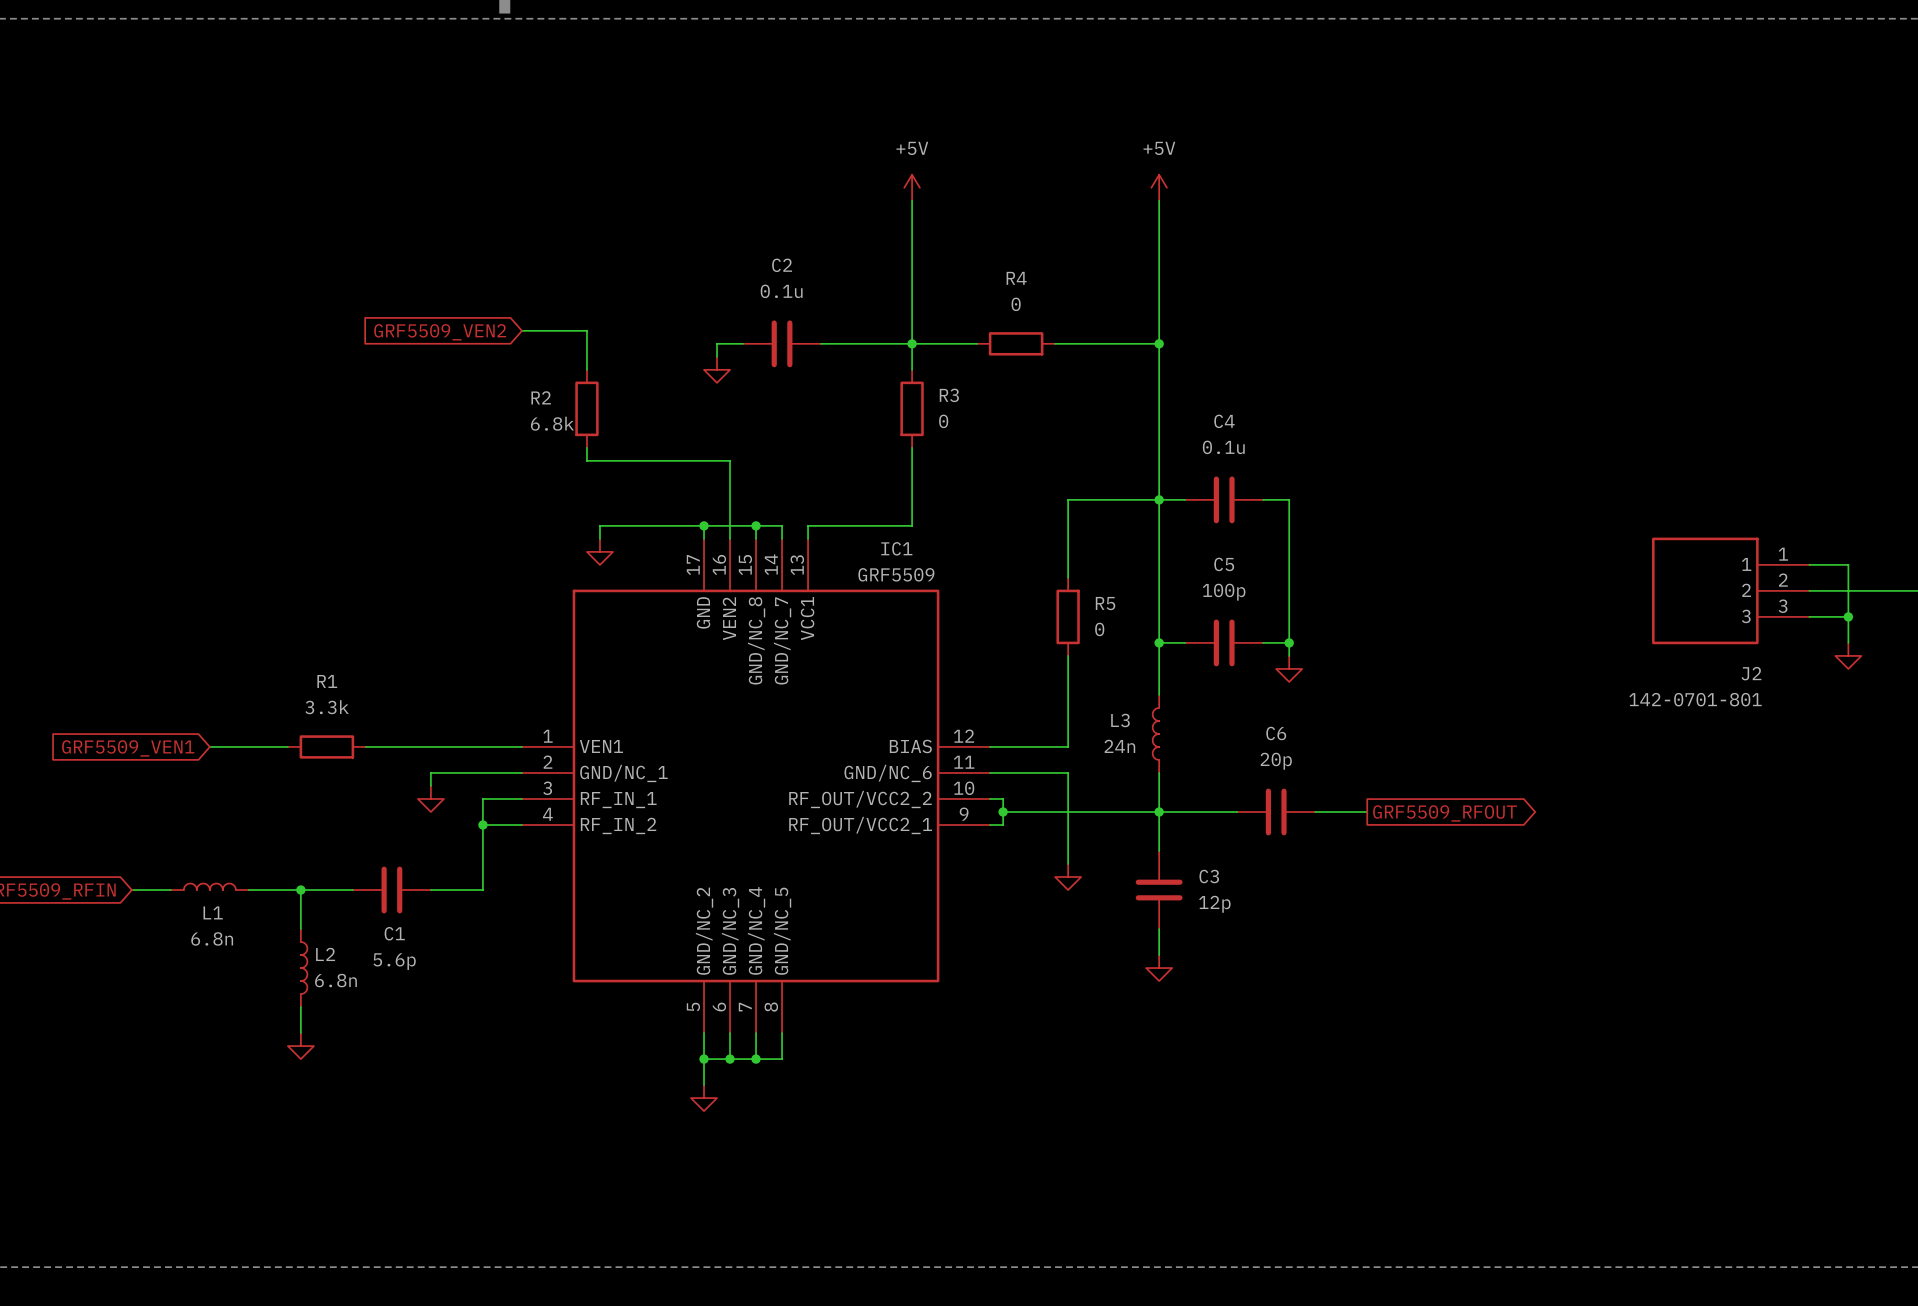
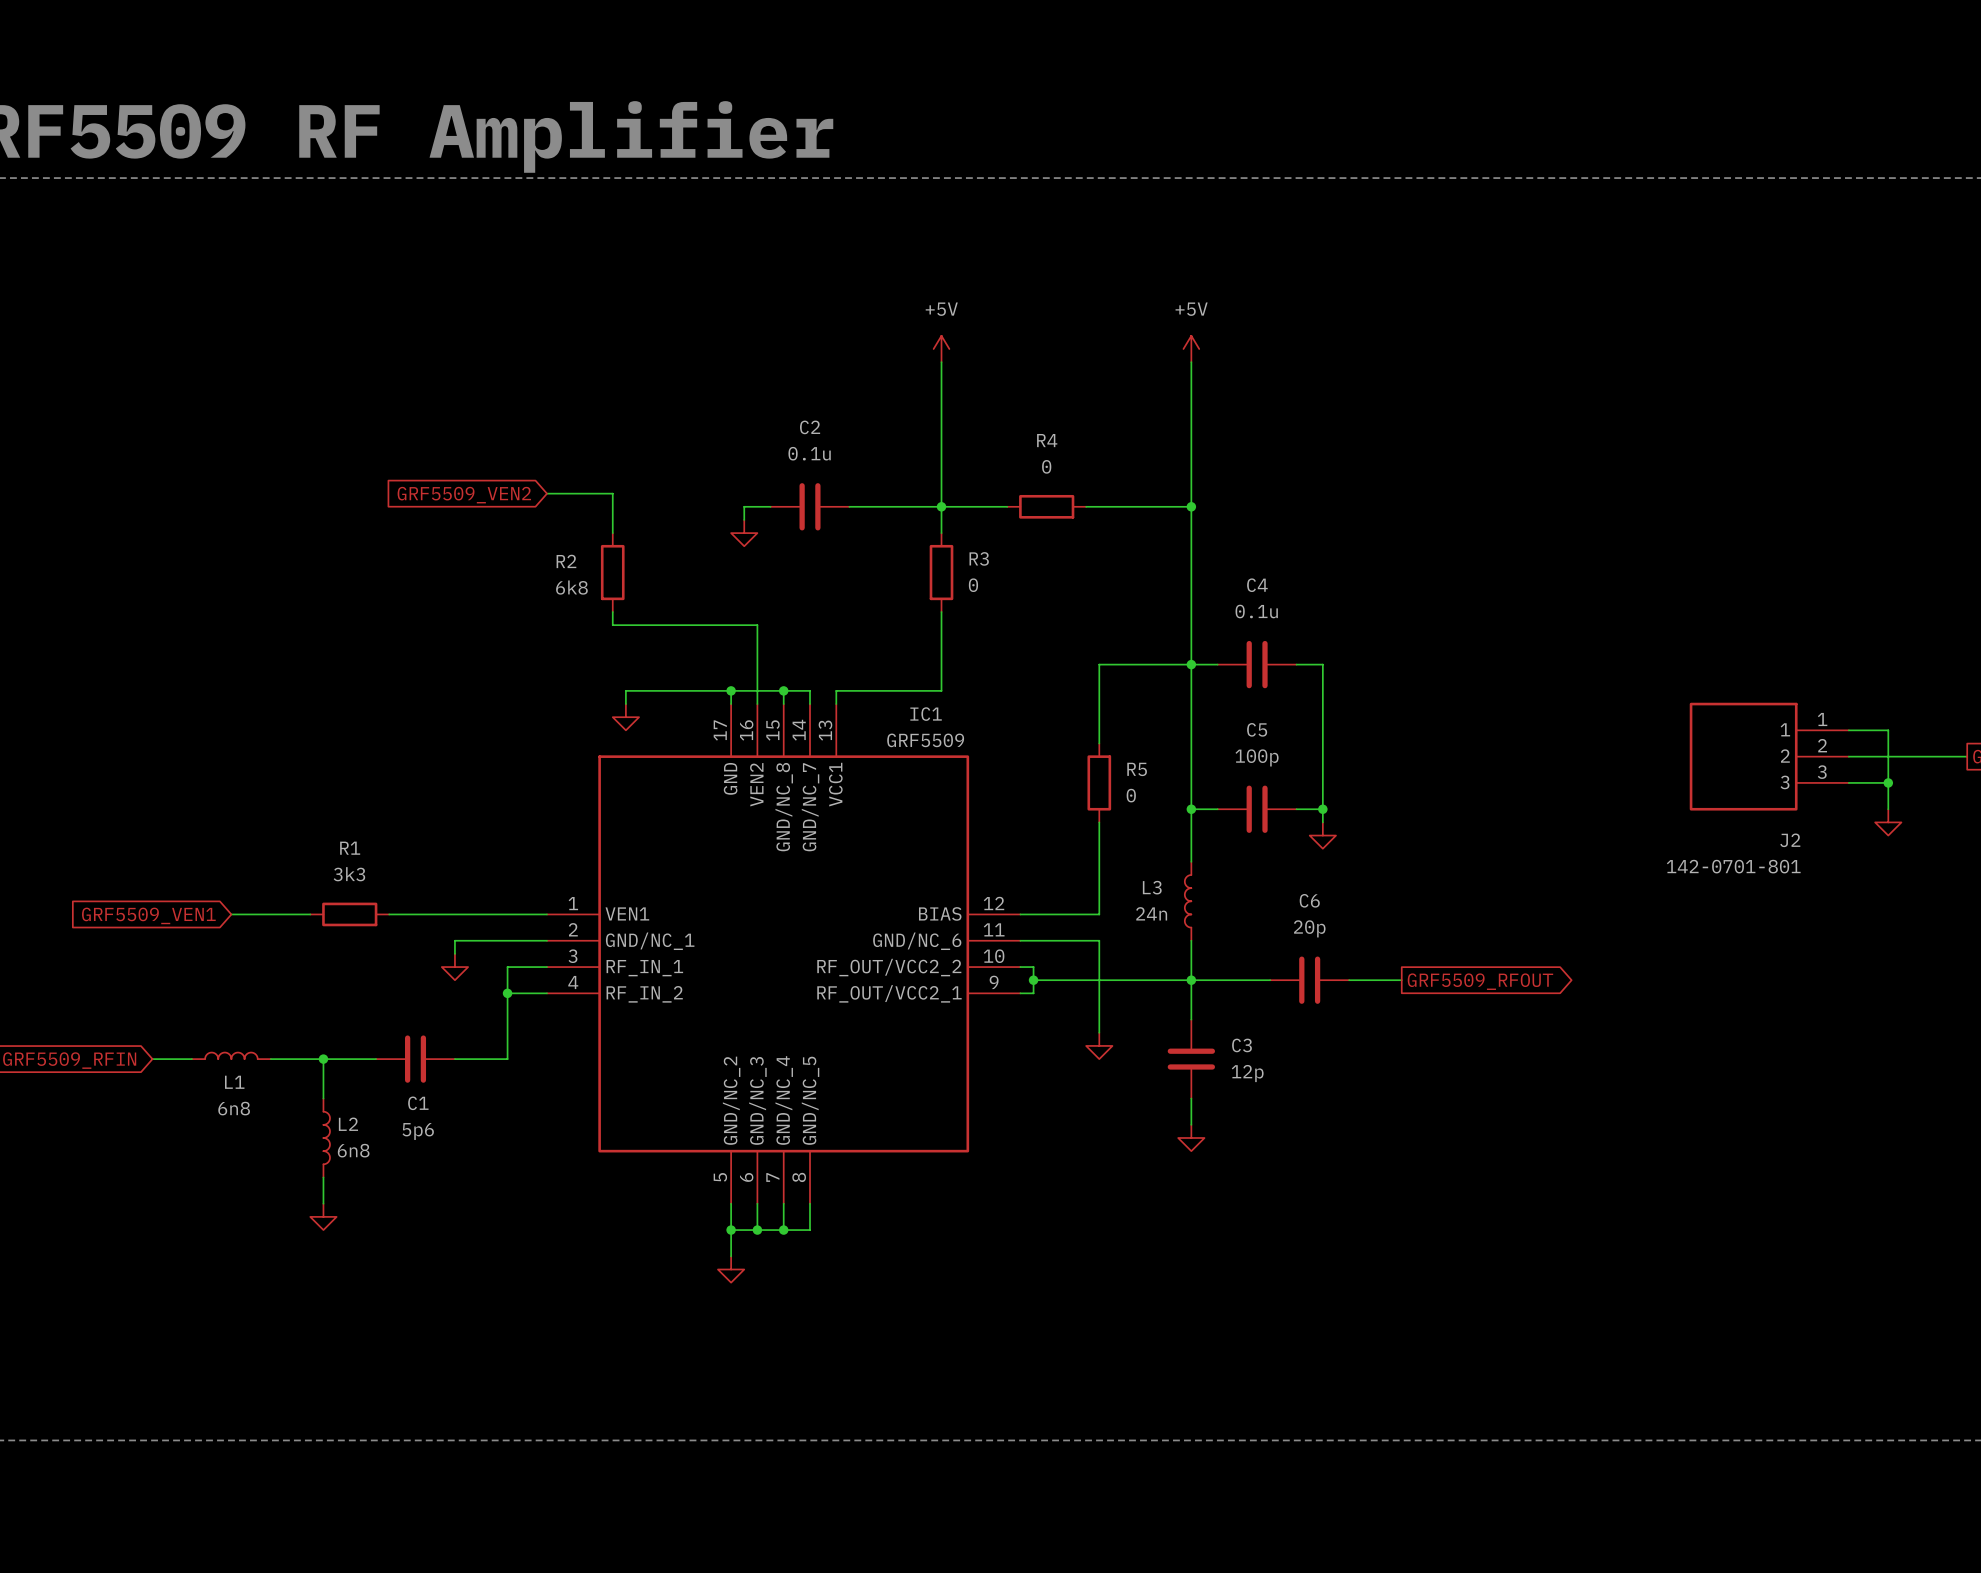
R2 value: 6.8k (552, 423) -> 6k8 (571, 587)
R1 value: 3.3k (327, 707) -> 3k3 (349, 874)
L1 value: 6.8n (212, 938) -> 6n8 (234, 1108)
C1 value: 5.6p (394, 961) -> 5p6 (418, 1131)
L2 value: 6.8n (335, 980) -> 6n8 (353, 1150)

